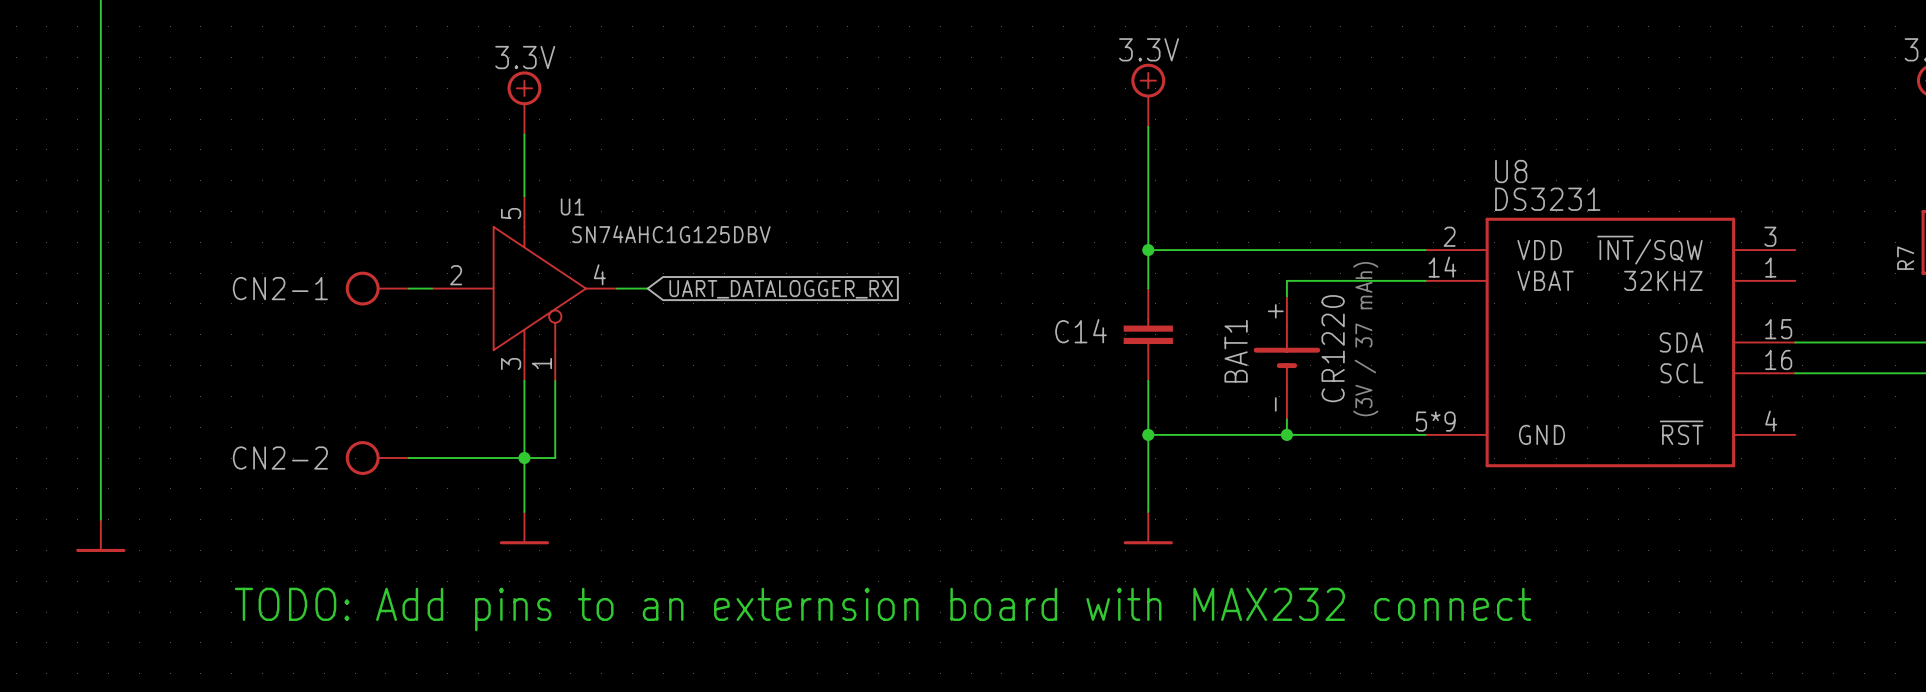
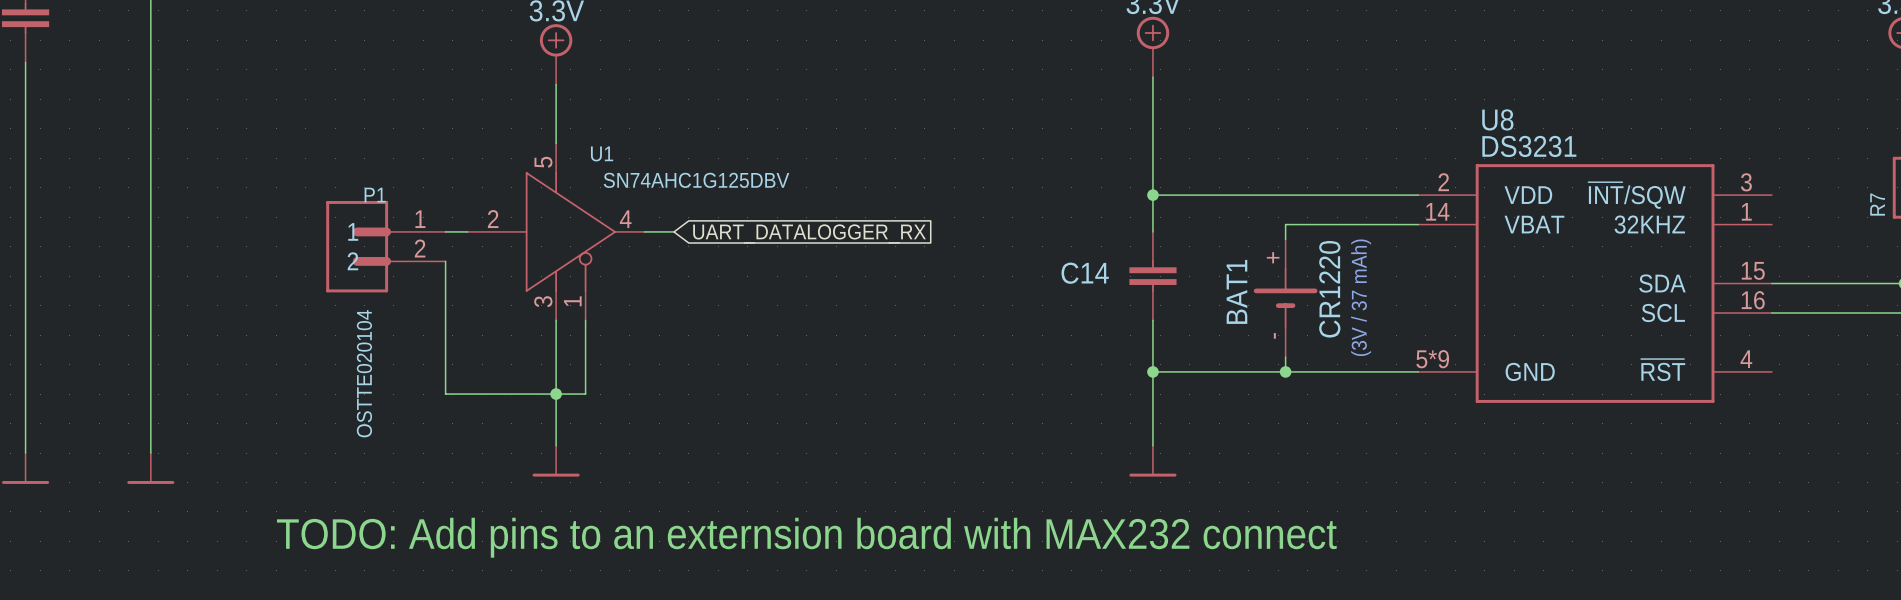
CN2-1: (377, 288) -> none
P1: none -> OSTTE020104 (385, 246)
wire: none -> (445, 261) (445, 394)
CN2-2: (377, 458) -> none

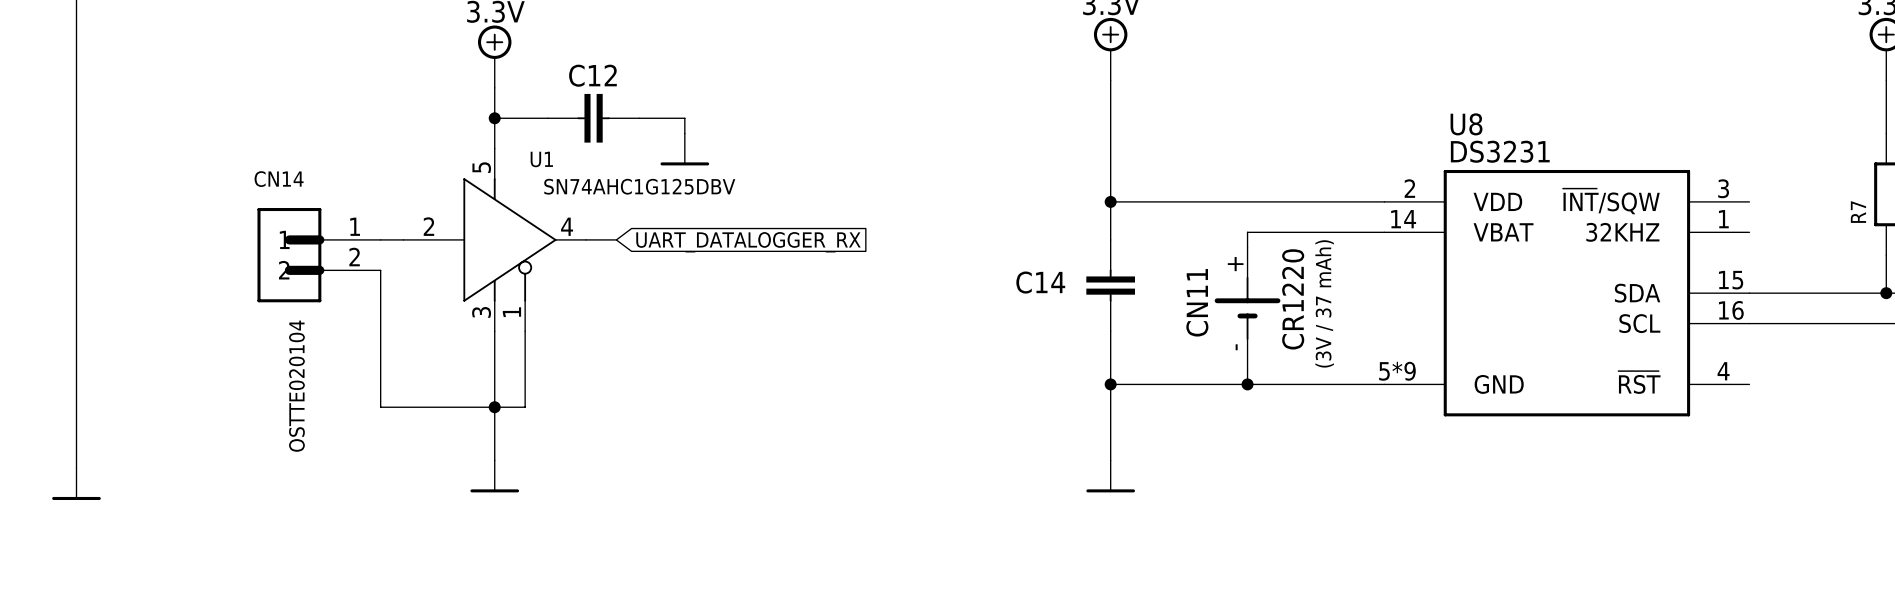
wire: none -> (494, 118) (547, 118)
junction: none -> (494, 118)
C12: none -> (593, 118)
wire: none -> (639, 118) (684, 118) (684, 133)
power symbol: none -> (684, 149)
P1 name: P1 (375, 195) -> CN14 (279, 179)
BAT1 name: BAT1 (1236, 291) -> CN11 (1197, 302)
text: TODO: Add pins to an externsion board with MAX232 connect (806, 537) -> none

